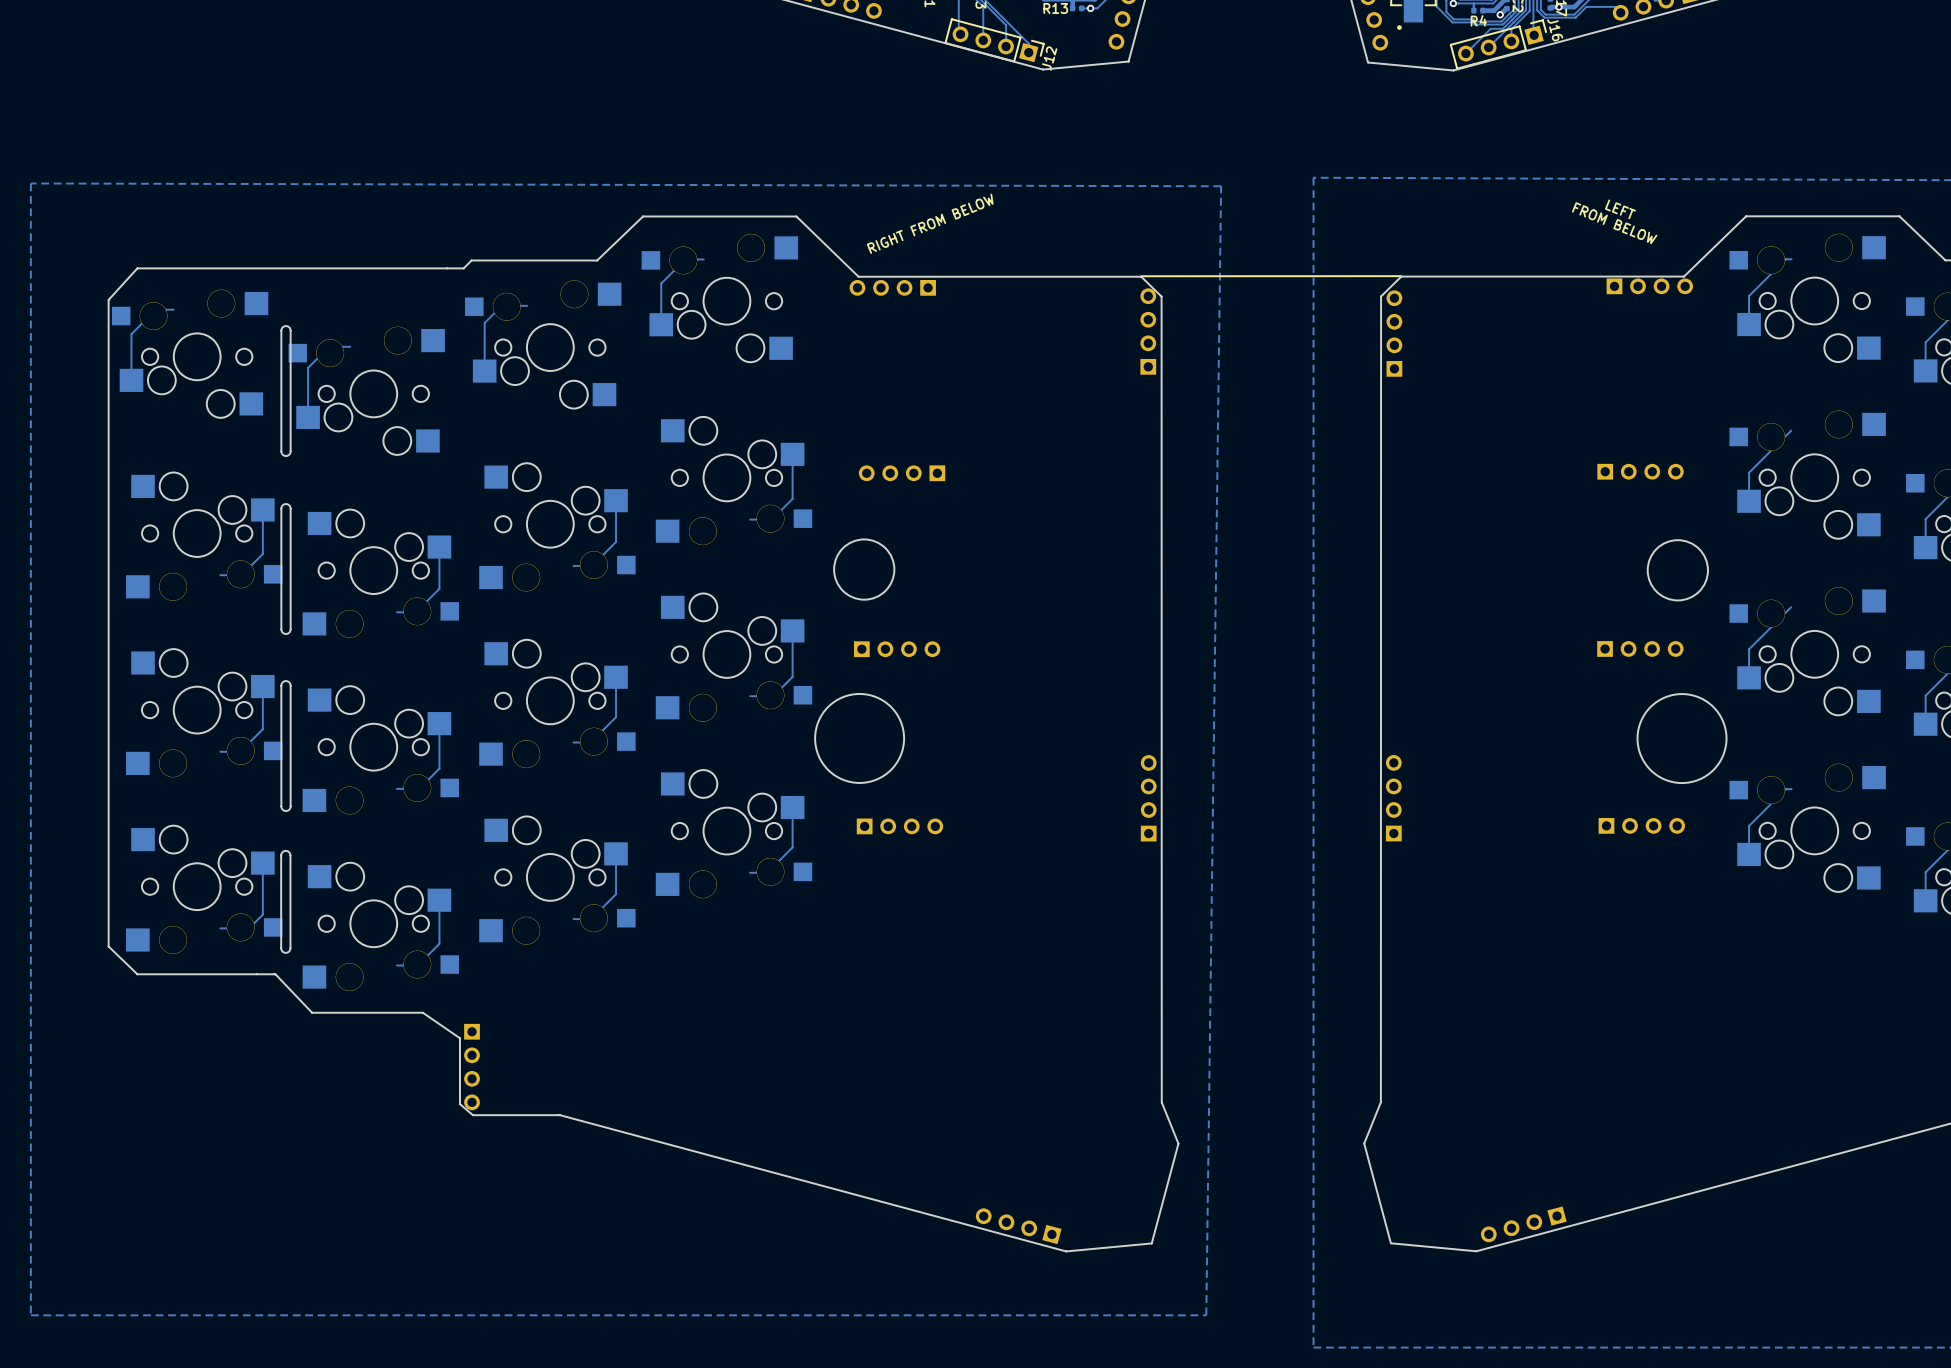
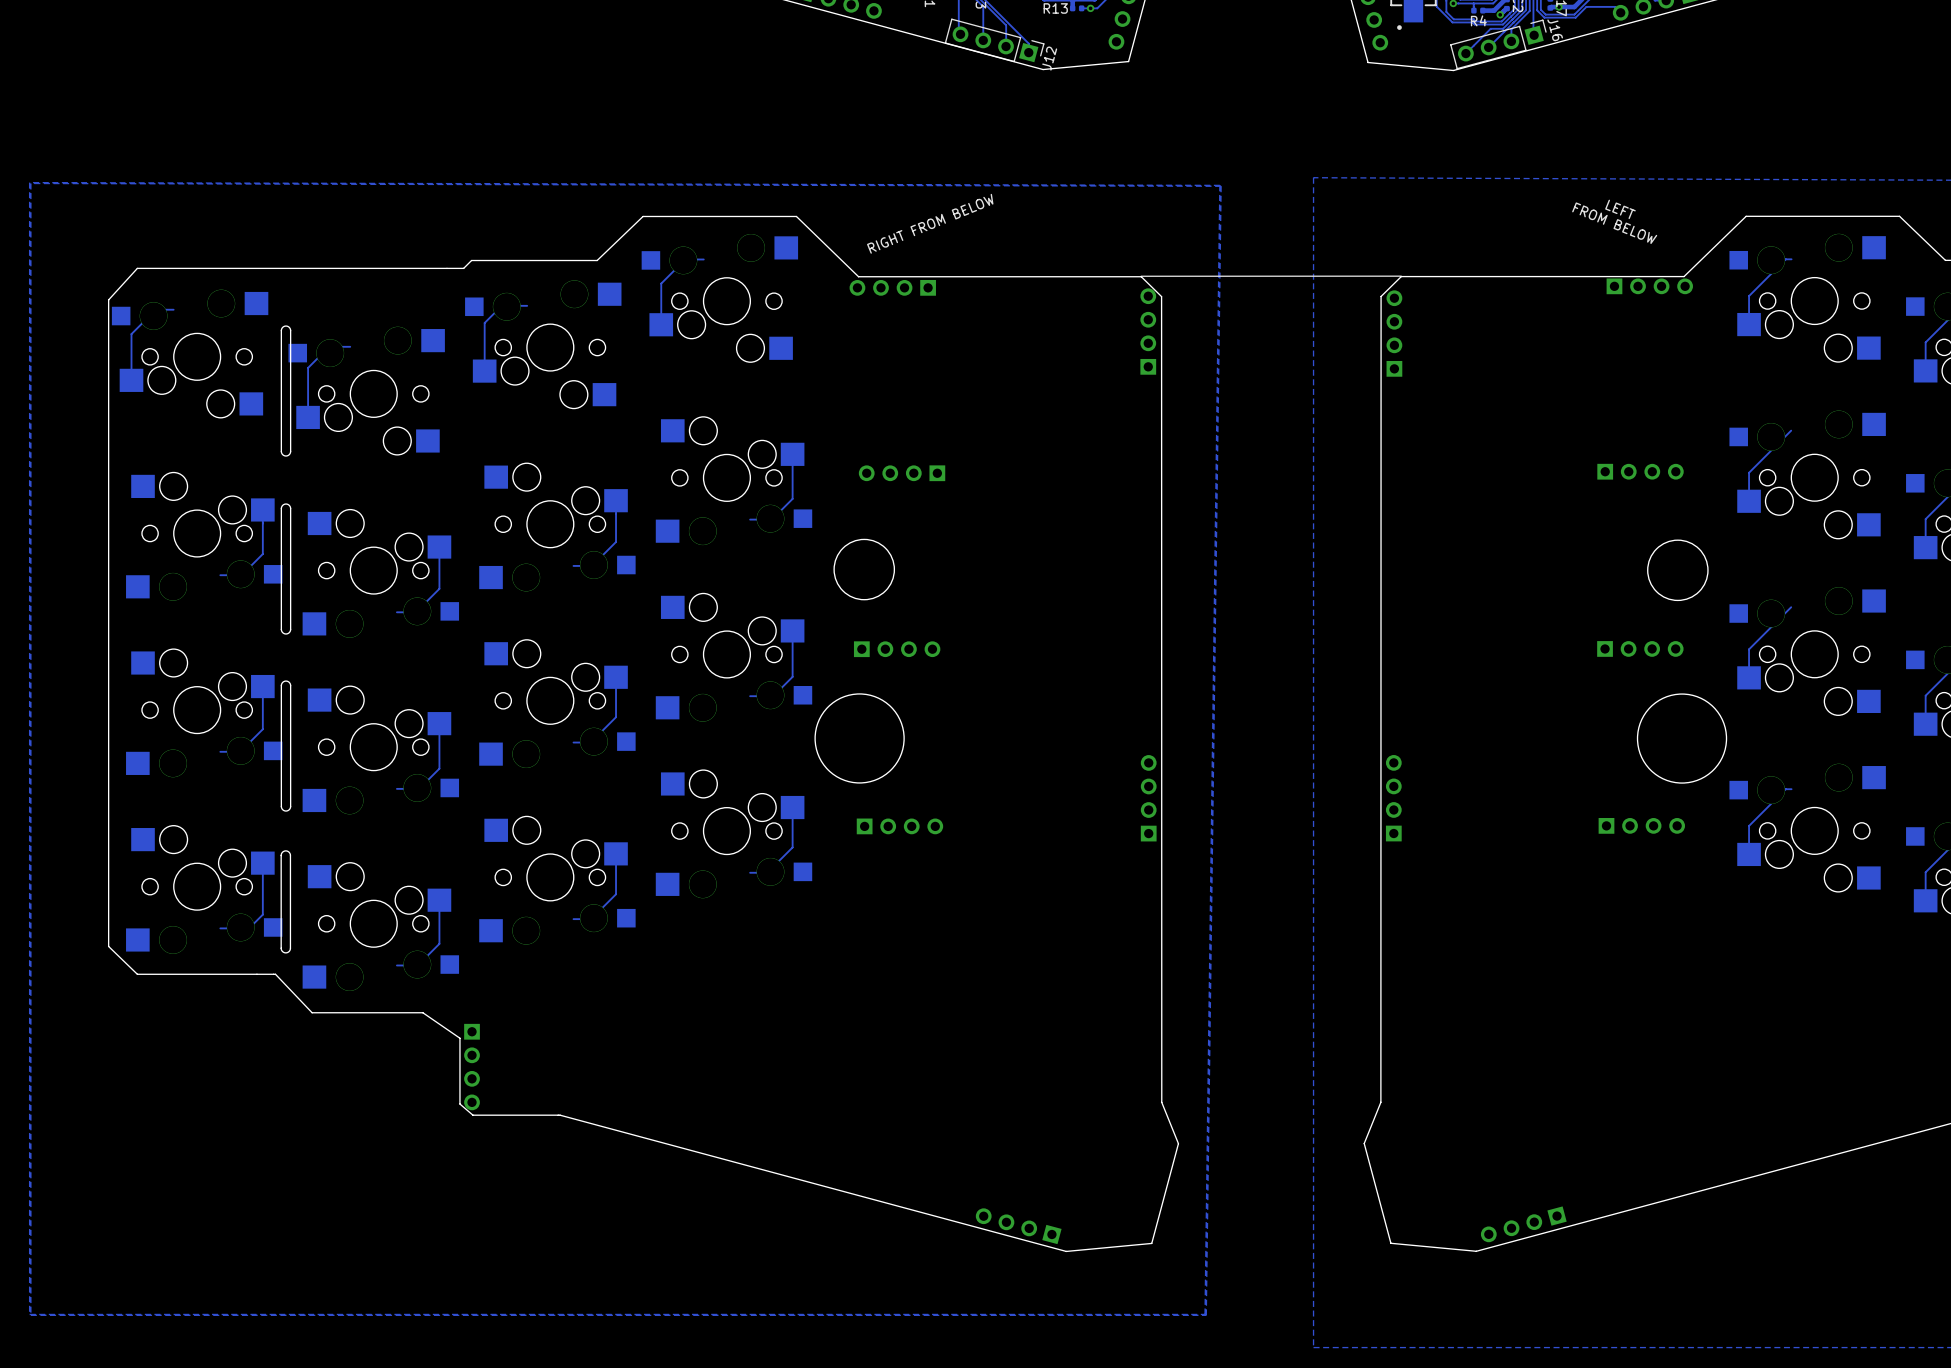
zone outline: none -> (29, 182) (1219, 185) (1205, 1314) (29, 1314) (29, 182)

